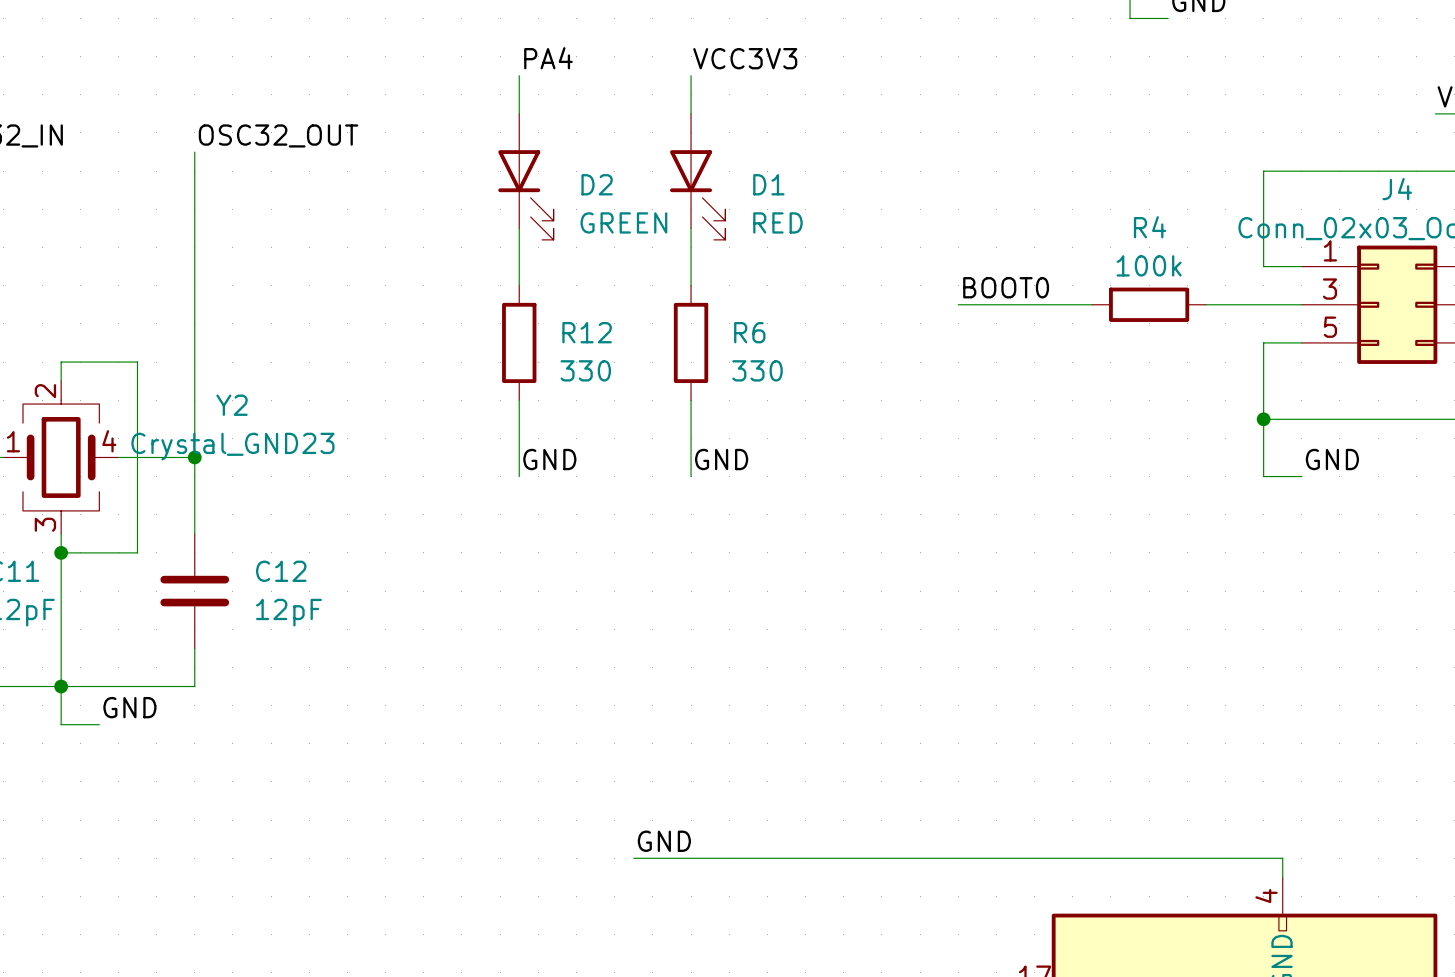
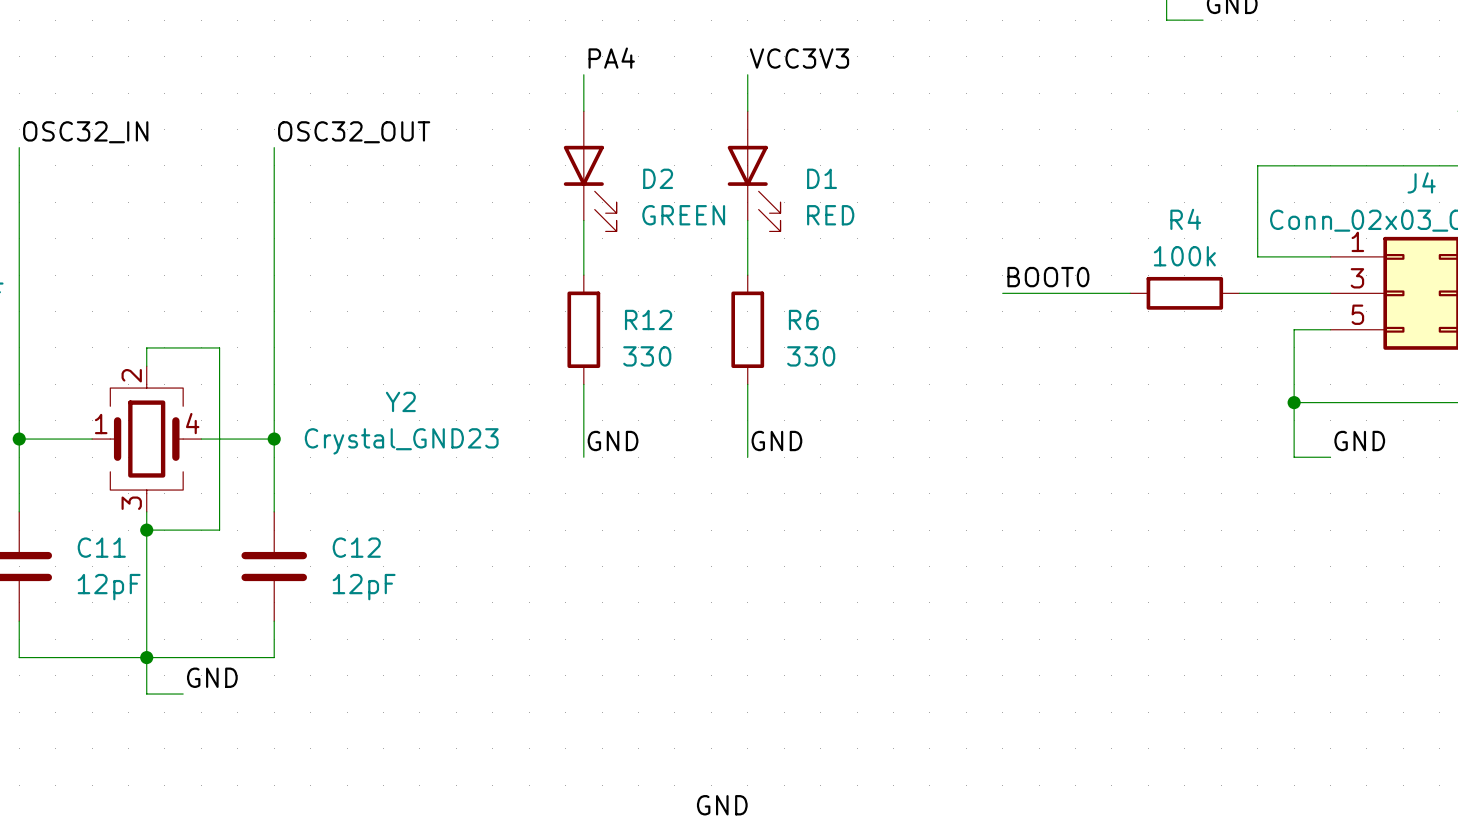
wire: (1263, 171) (1263, 266) -> (1294, 165) (1257, 165) (1257, 256) (1294, 256)
Y2 name position: Y2 (232, 405) -> Y2 (400, 401)
Y2 value position: Crystal_GND23 (232, 446) -> Crystal_GND23 (401, 441)

